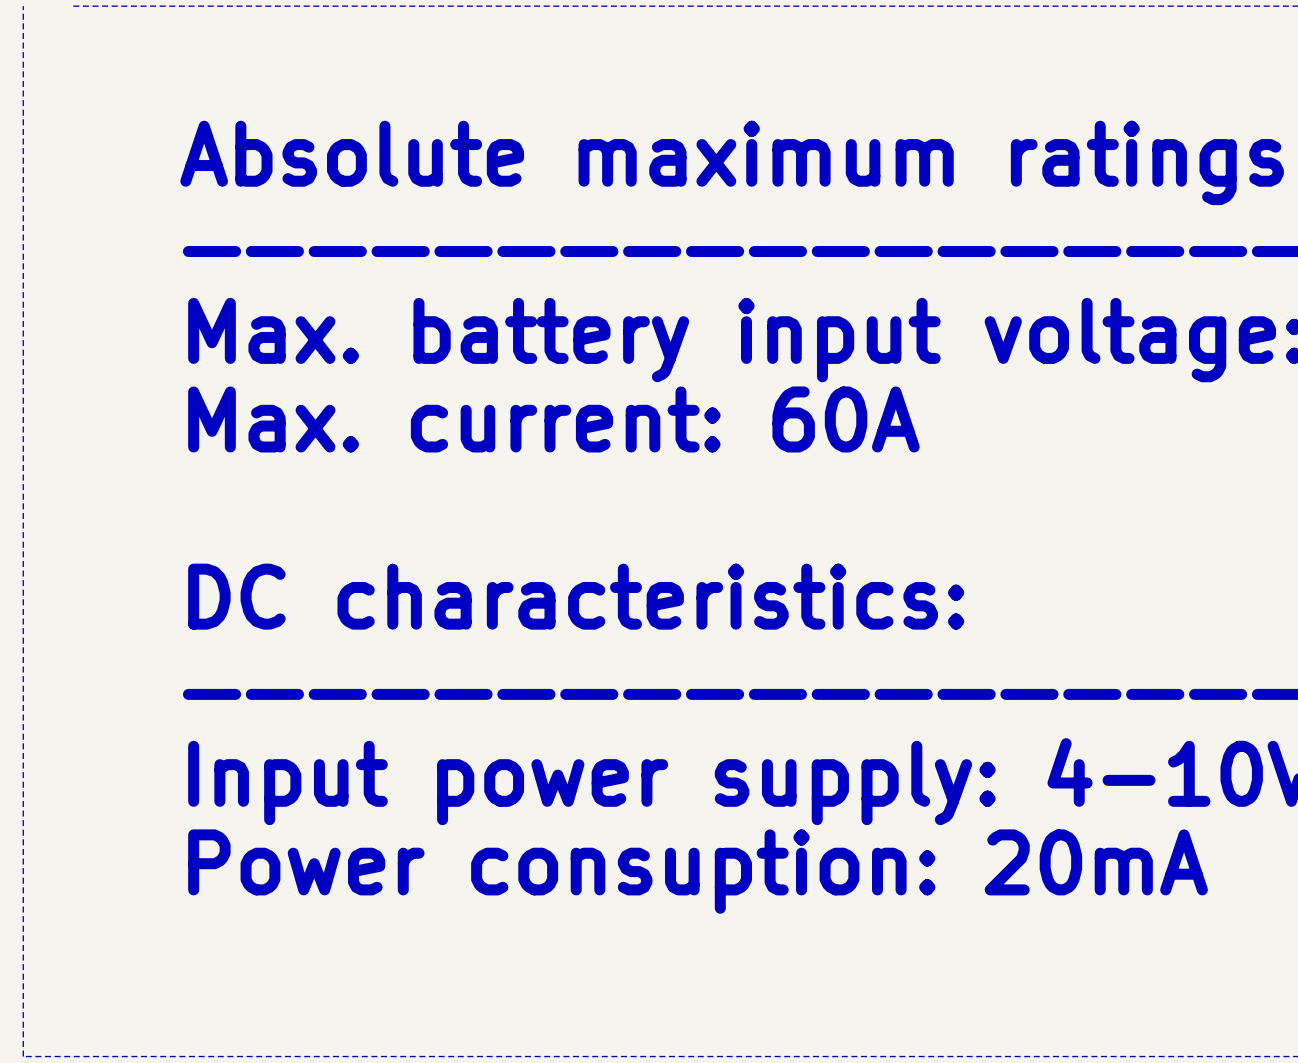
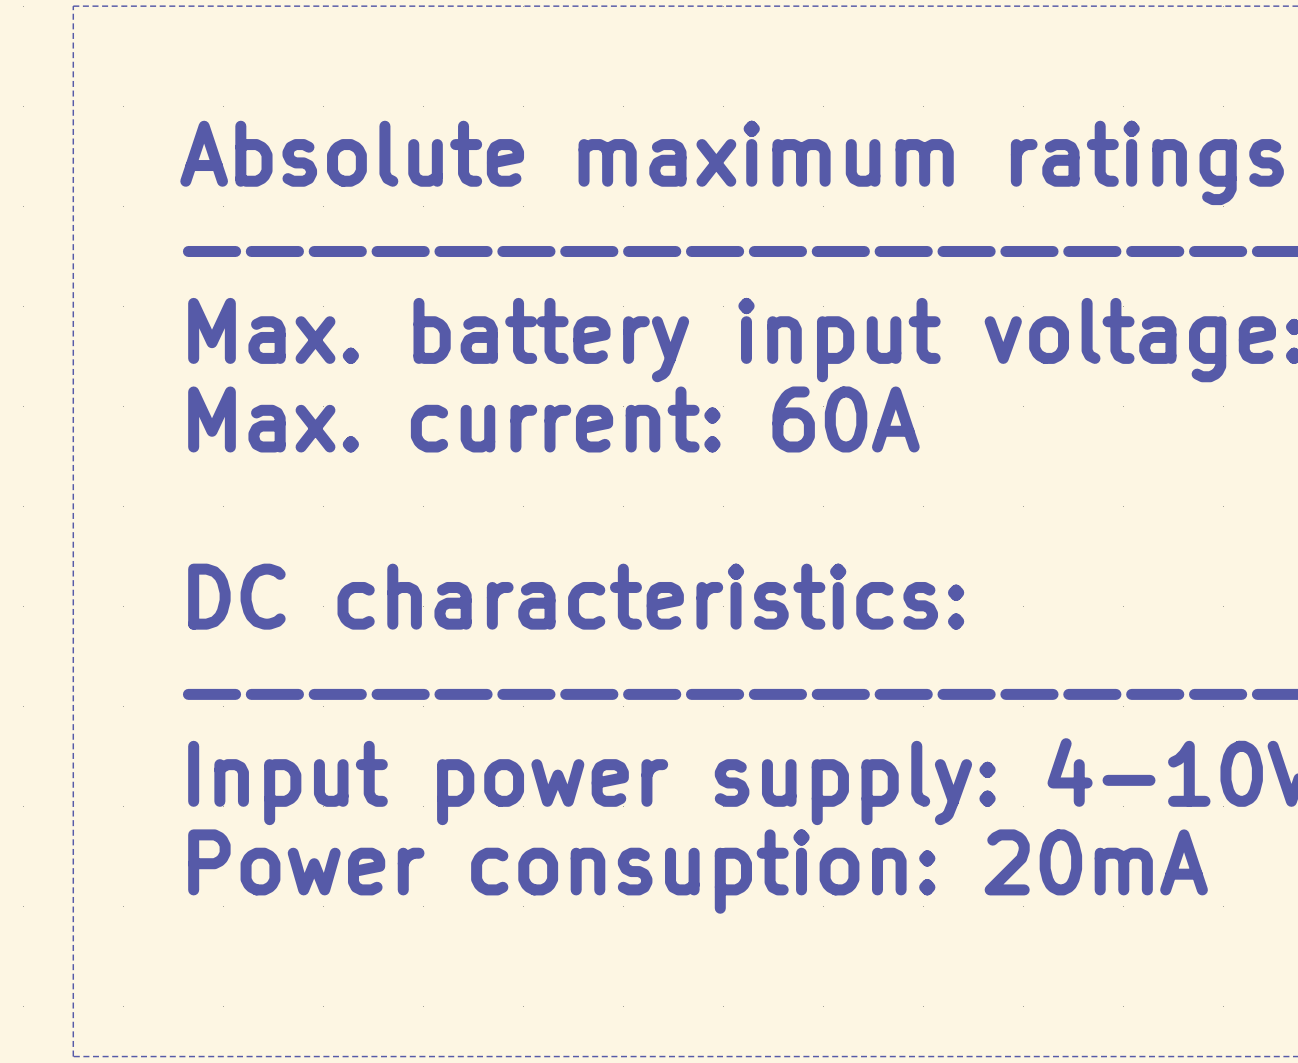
line: (23, 6) (23, 1056) (73, 1056) -> (73, 6) (73, 1056)

